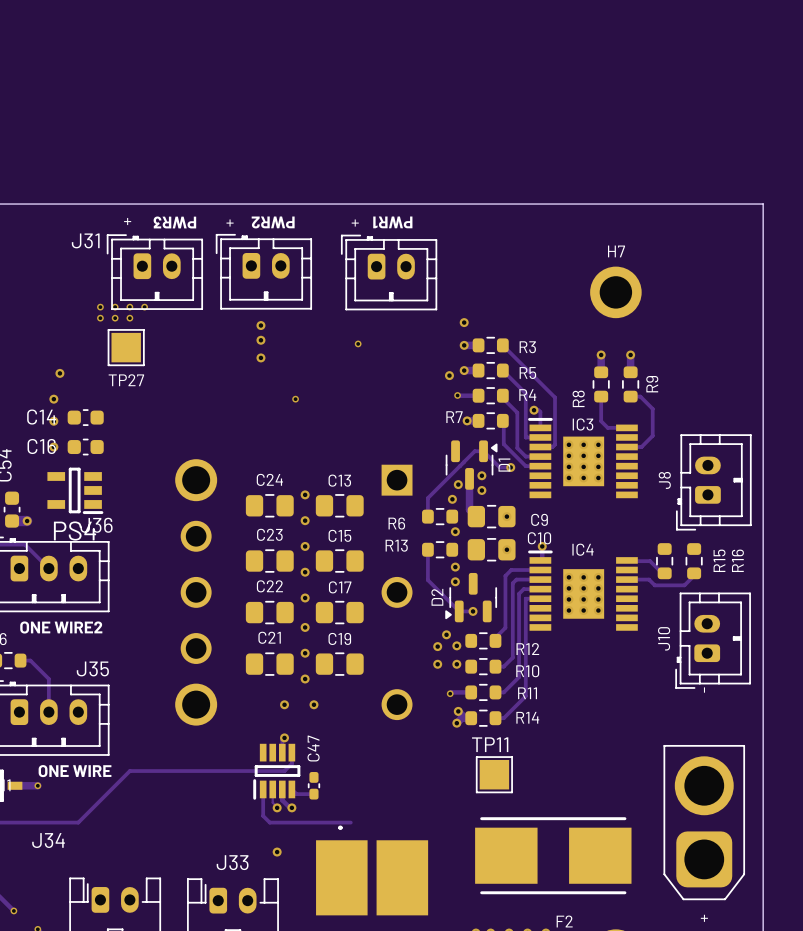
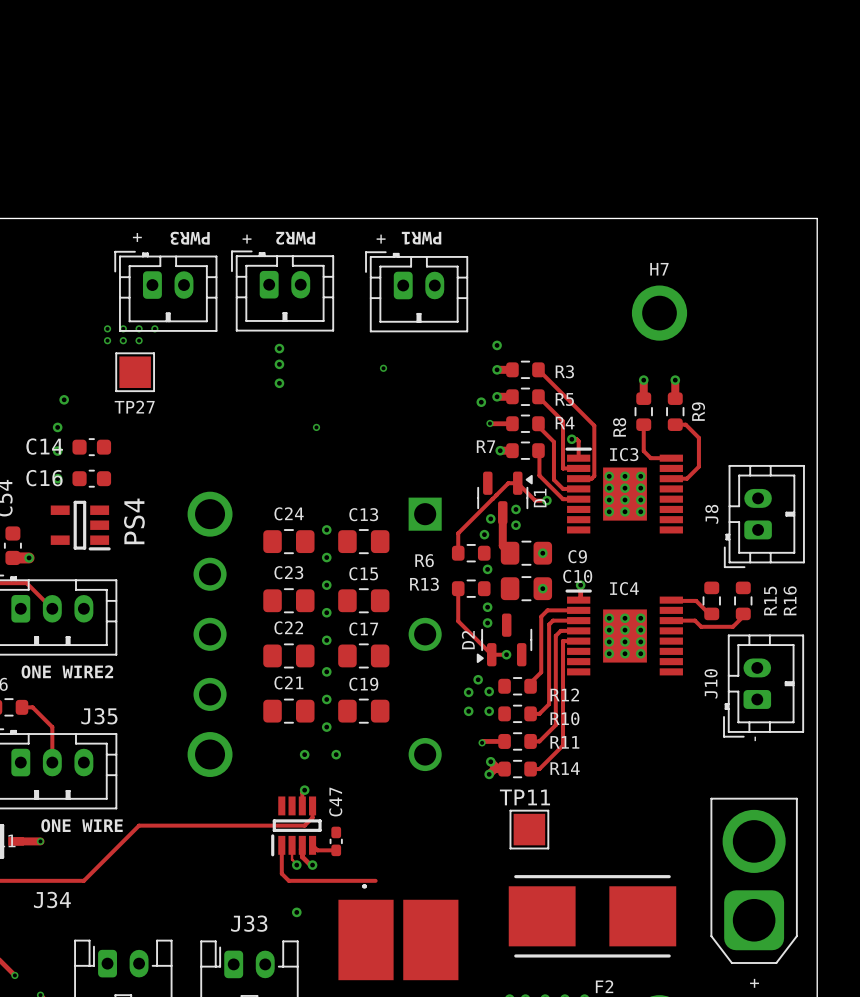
J31 name: J31 (85, 240) -> none
J36 name: J36 (96, 525) -> none
PS4 name rotation: 0° (75, 531) -> 90° counterclockwise (134, 521)
PS4 name position: PS4 (75, 531) -> PS4 (134, 521)

